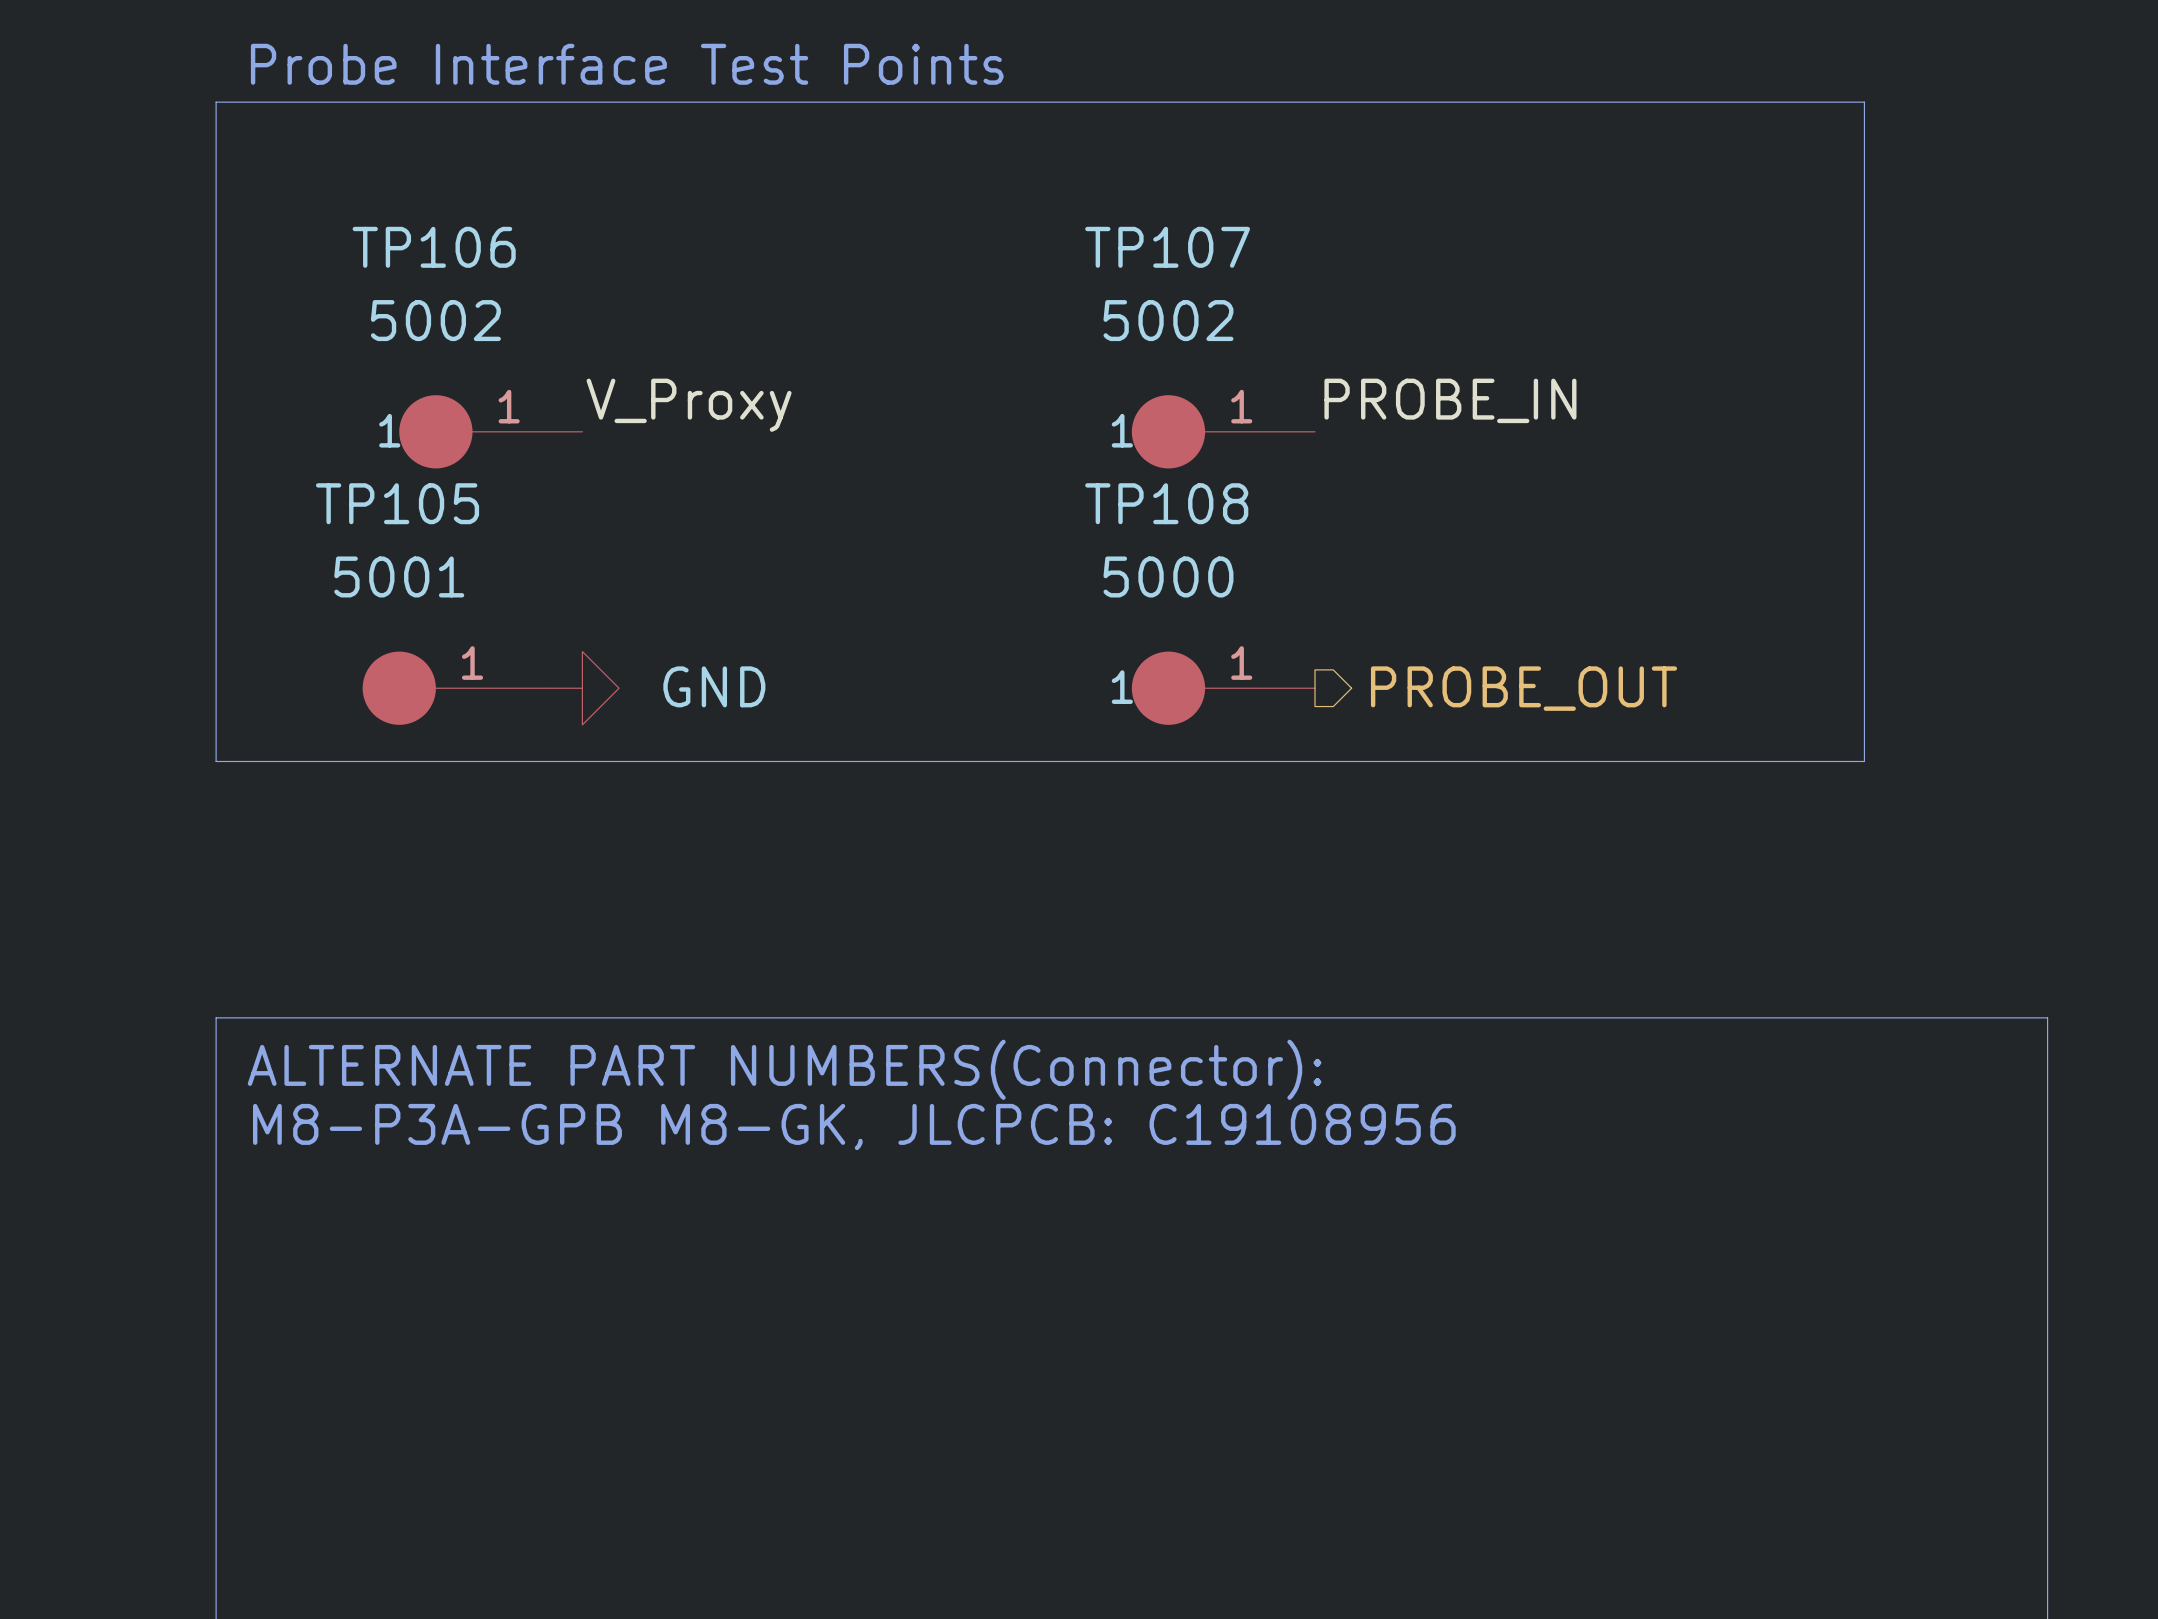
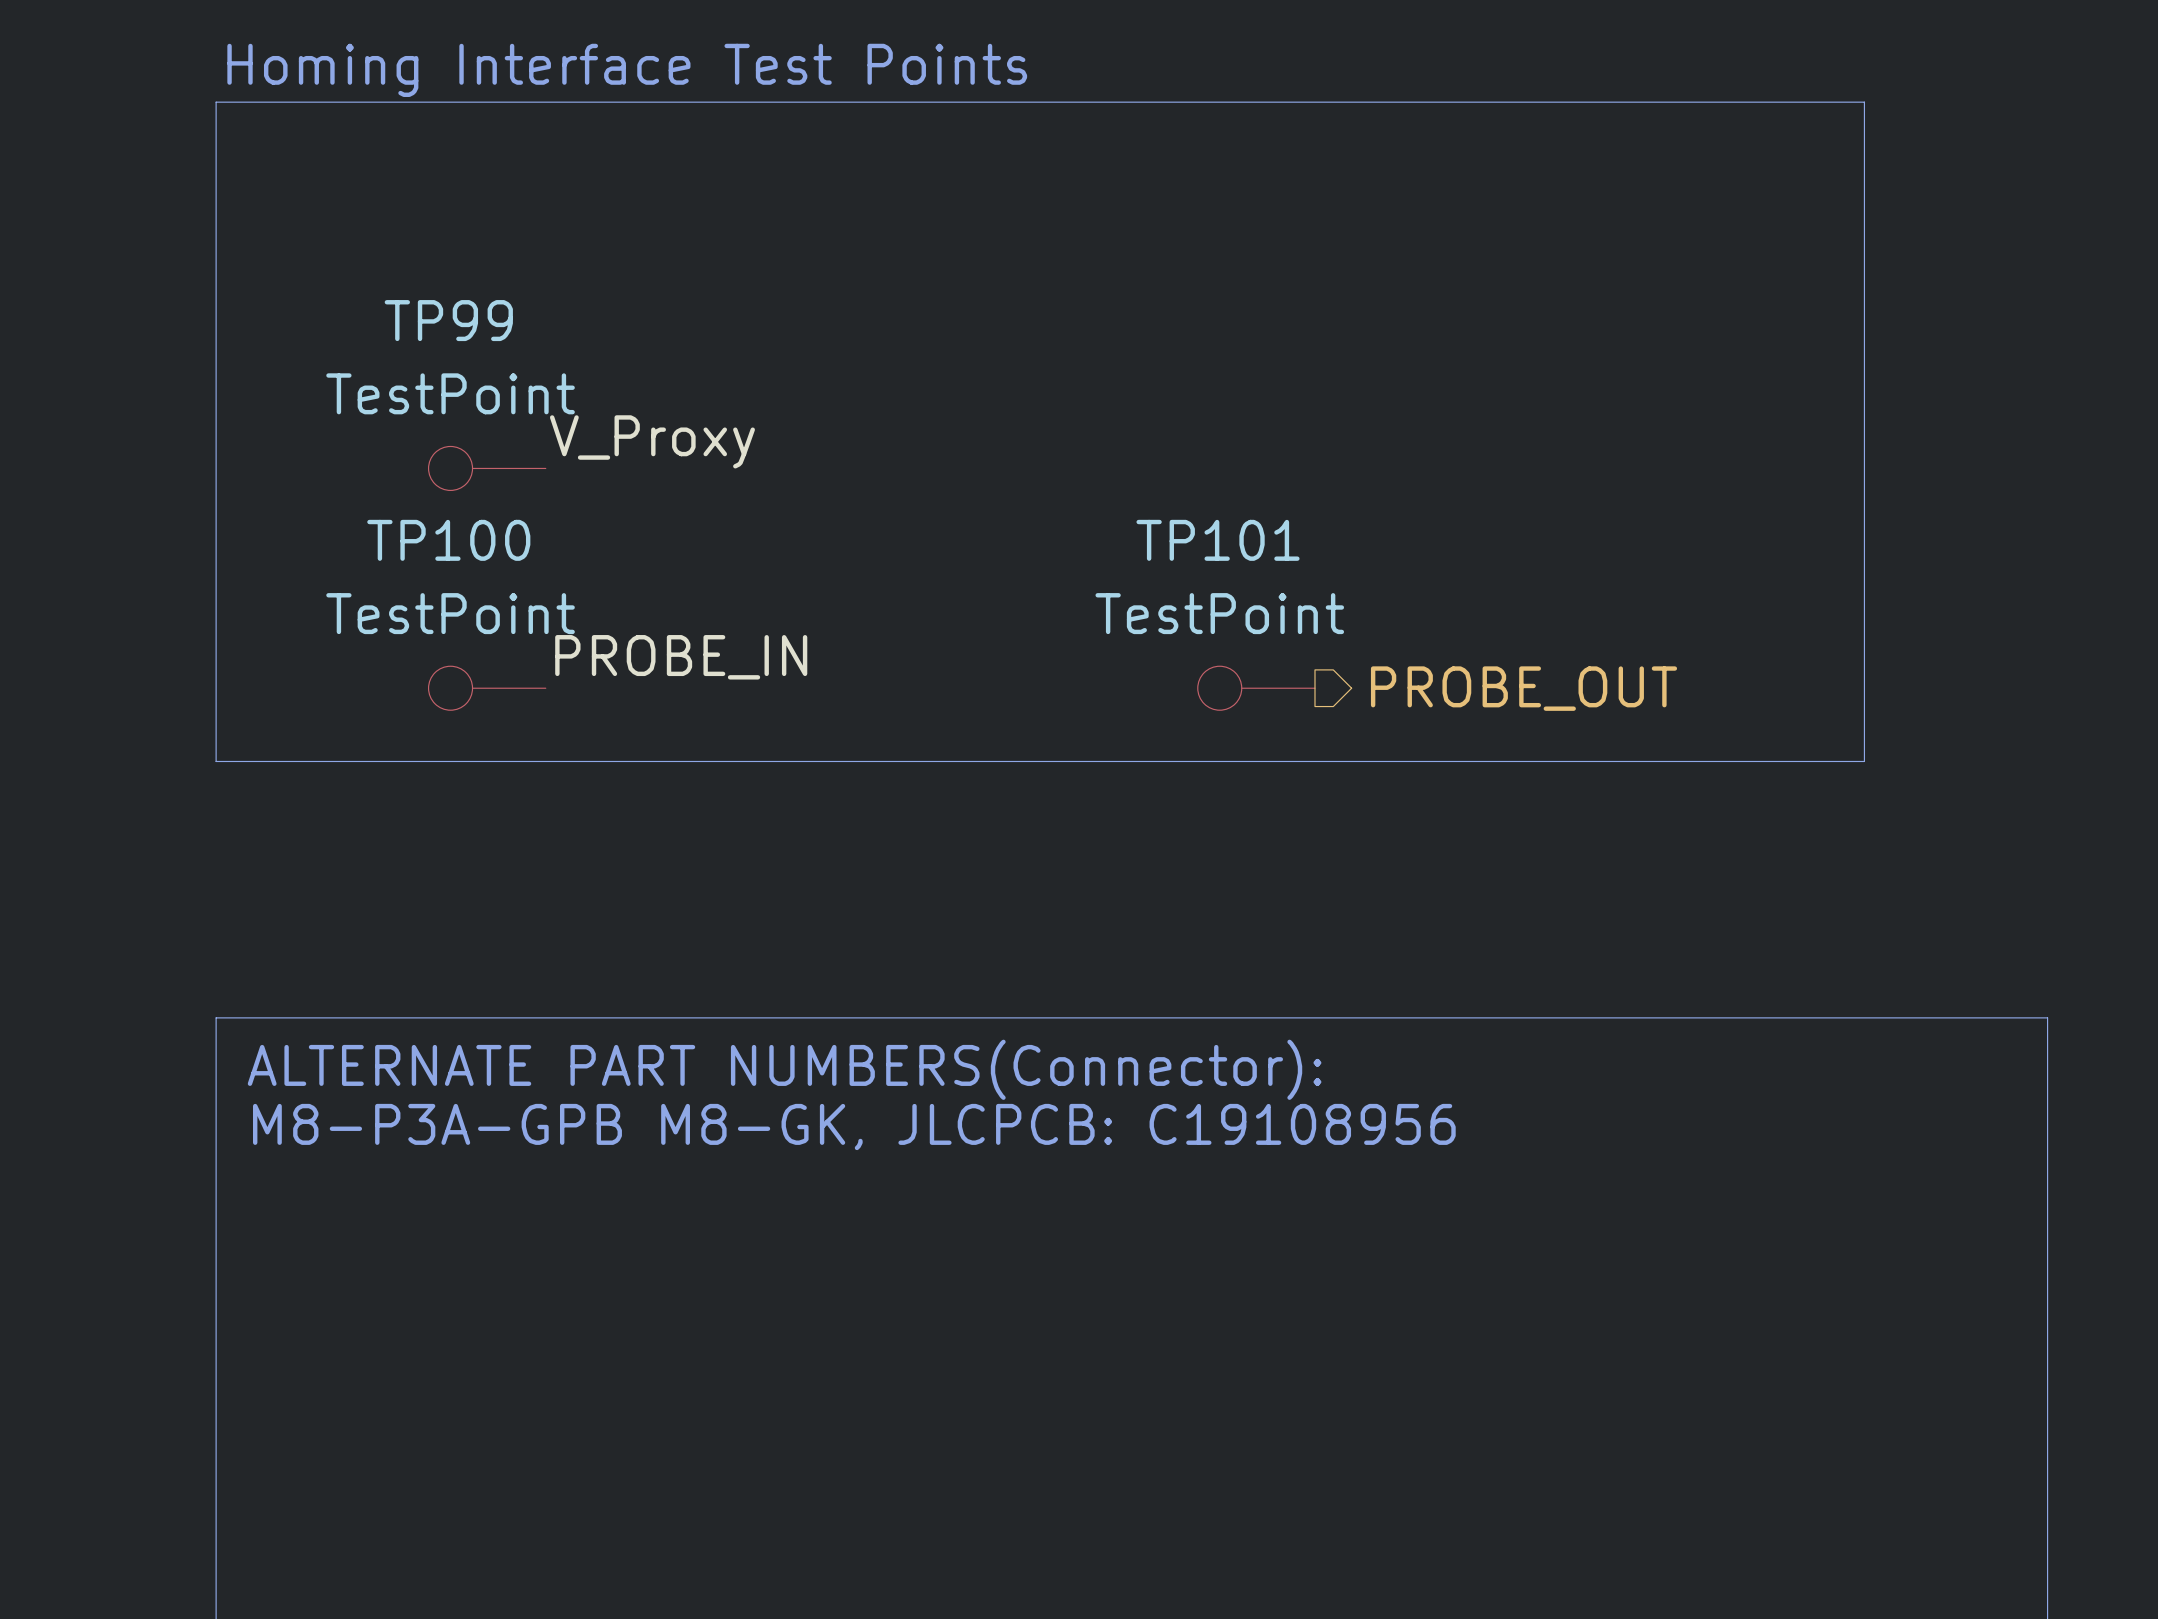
text: Probe Interface Test Points (627, 64) -> Homing Interface Test Points (627, 70)
label: PROBE_IN (1450, 400) -> none
label position: V_Proxy (689, 405) -> V_Proxy (652, 441)
TP106: 5002 (490, 431) -> none
TP107: 5002 (1223, 431) -> none
TP99: none -> TestPoint (487, 468)
label: none -> PROBE_IN (681, 657)
TP105: 5001 (454, 688) -> none
TP100: none -> TestPoint (487, 688)
power symbol: GND (582, 688) -> none
TP108: 5000 (1223, 688) -> none
TP101: none -> TestPoint (1256, 688)

